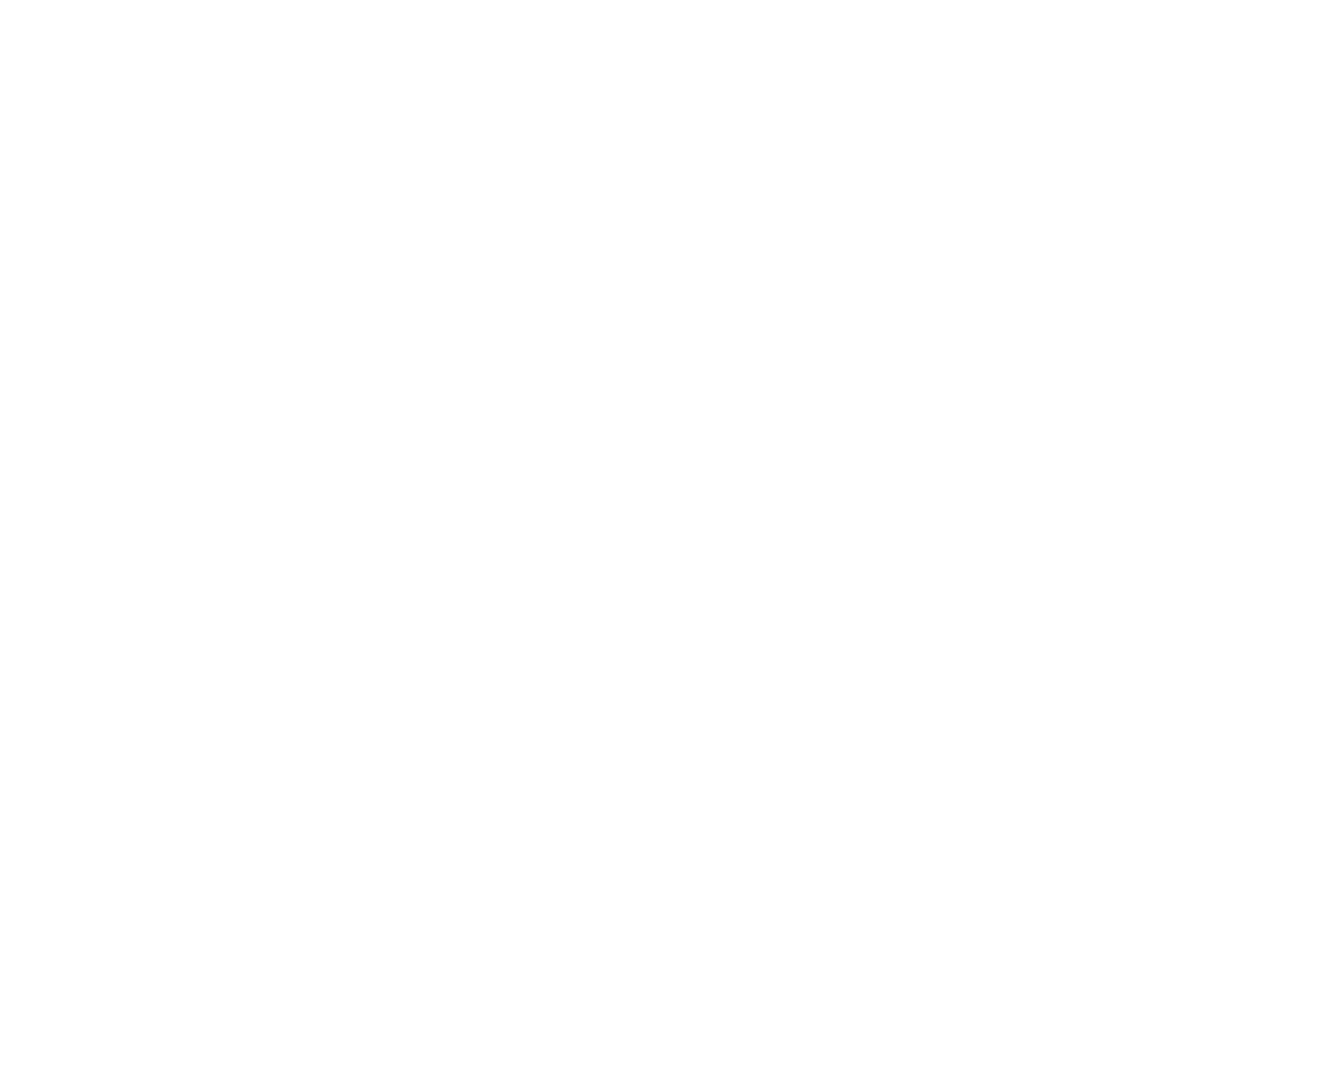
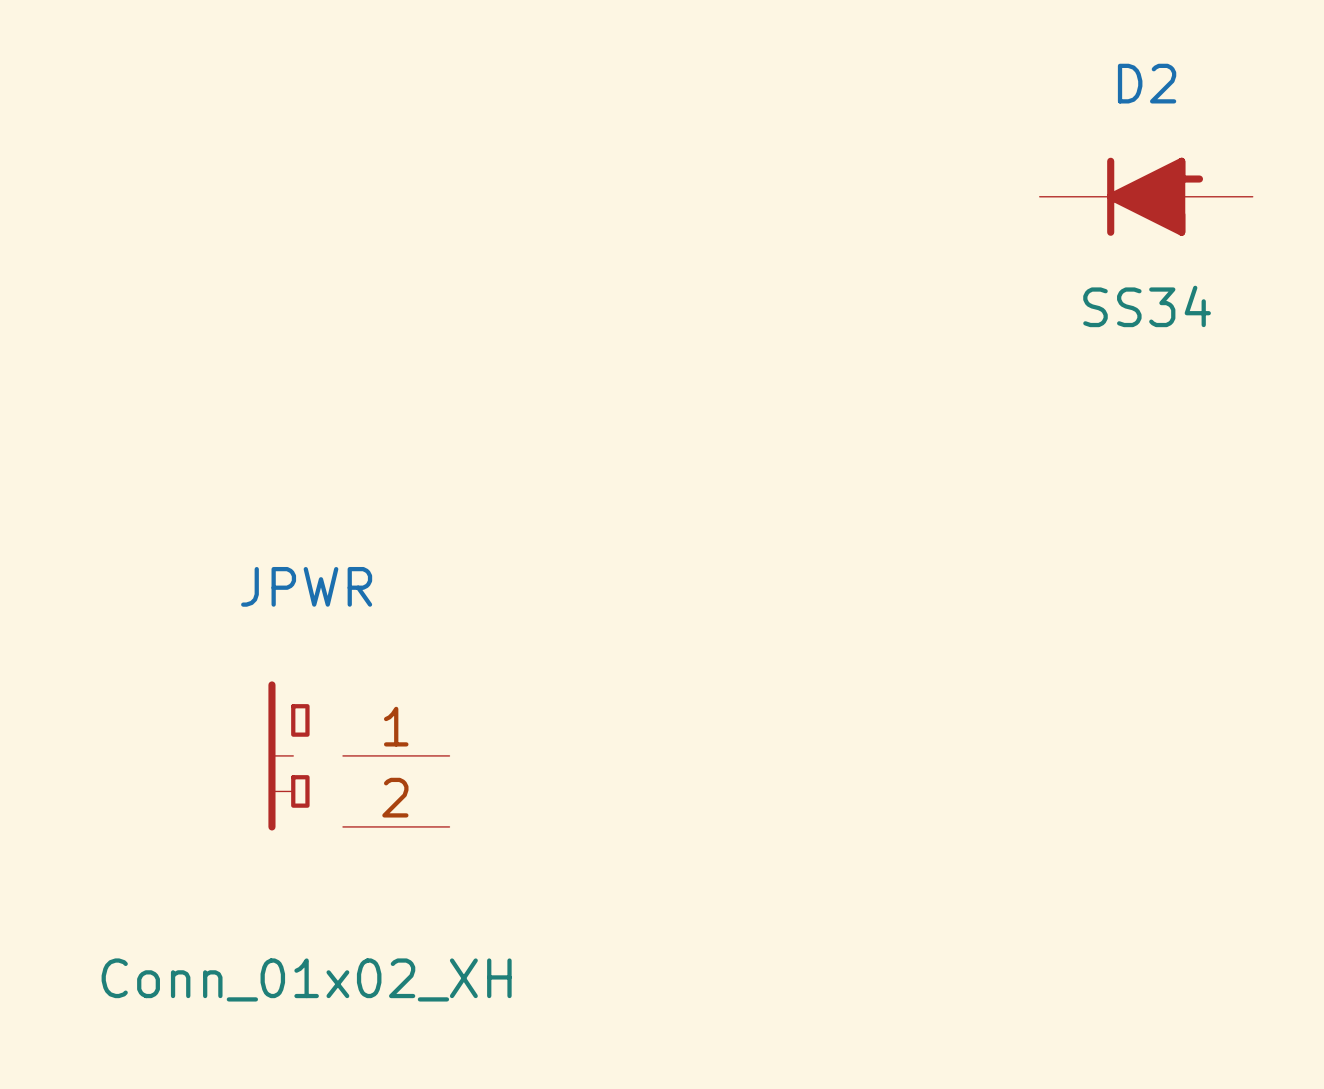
D2: none -> SS34 (1146, 196)
JPWR: none -> Conn_01x02_XH (358, 755)

